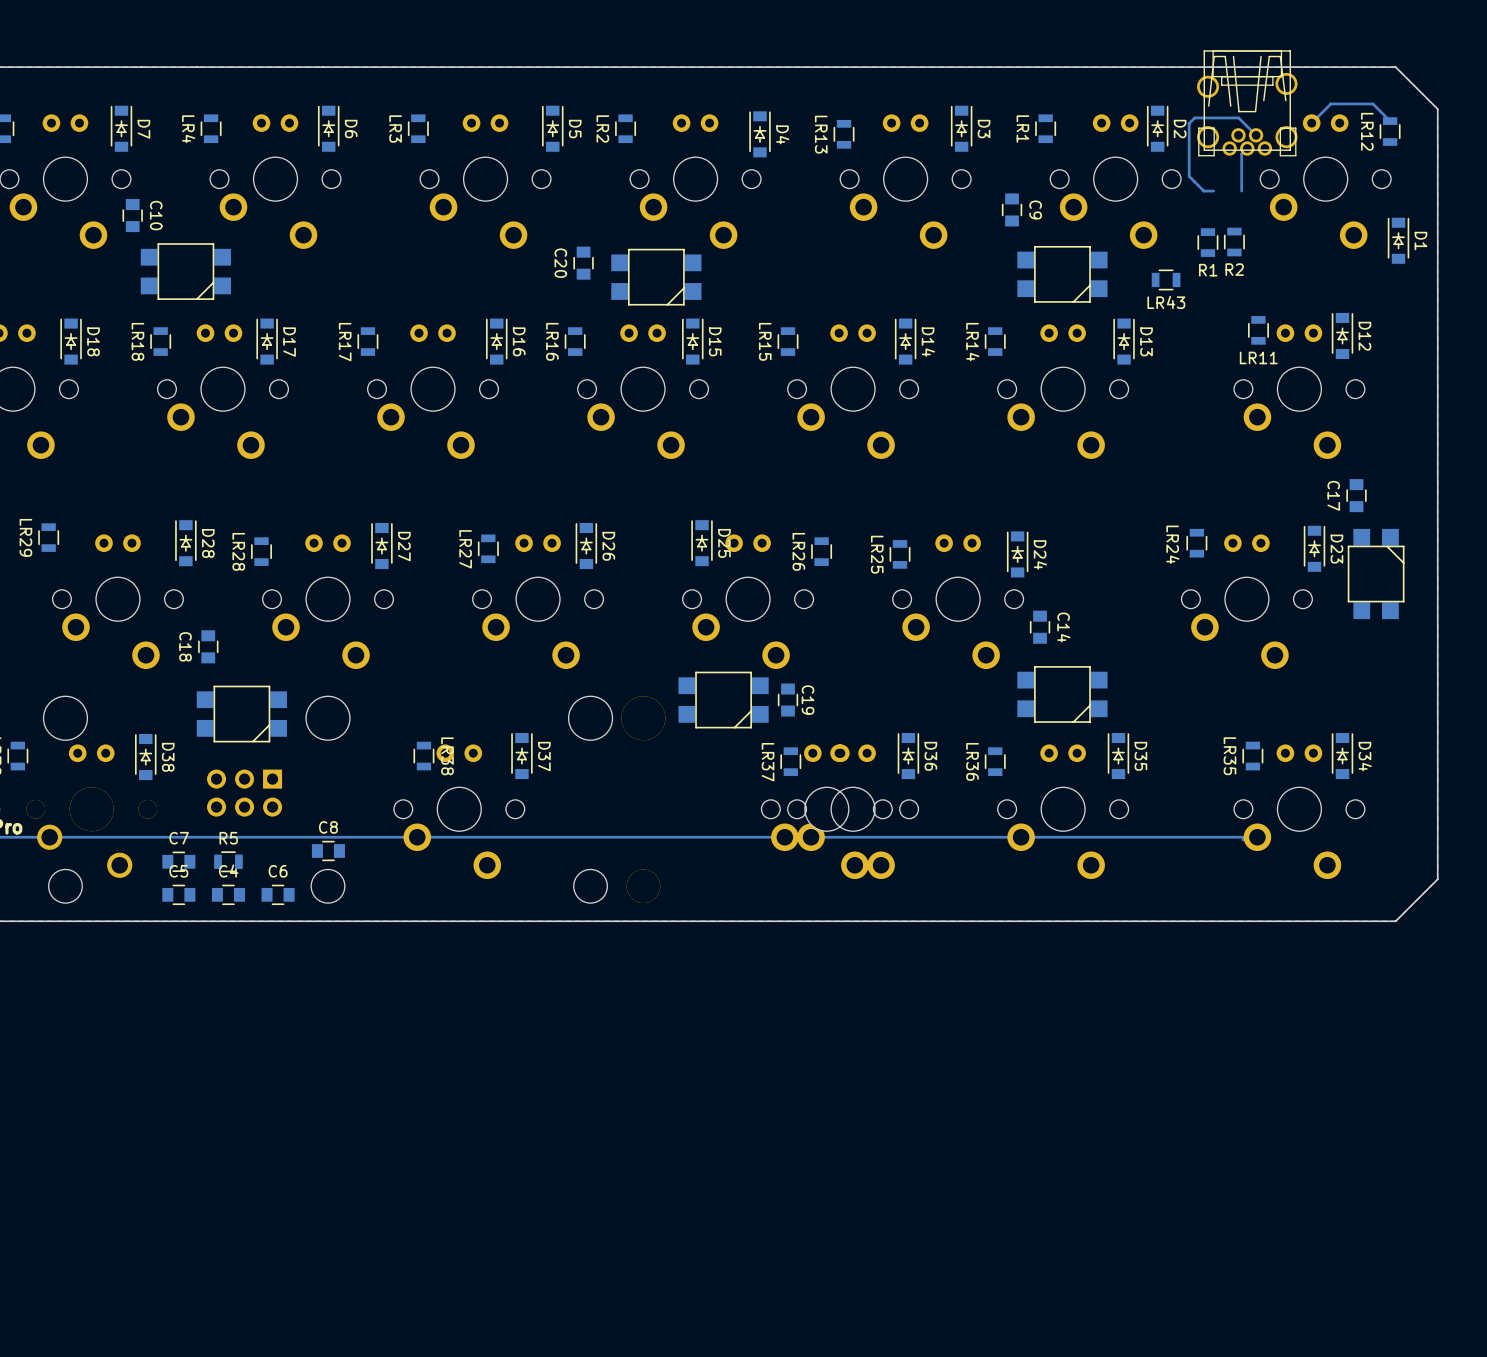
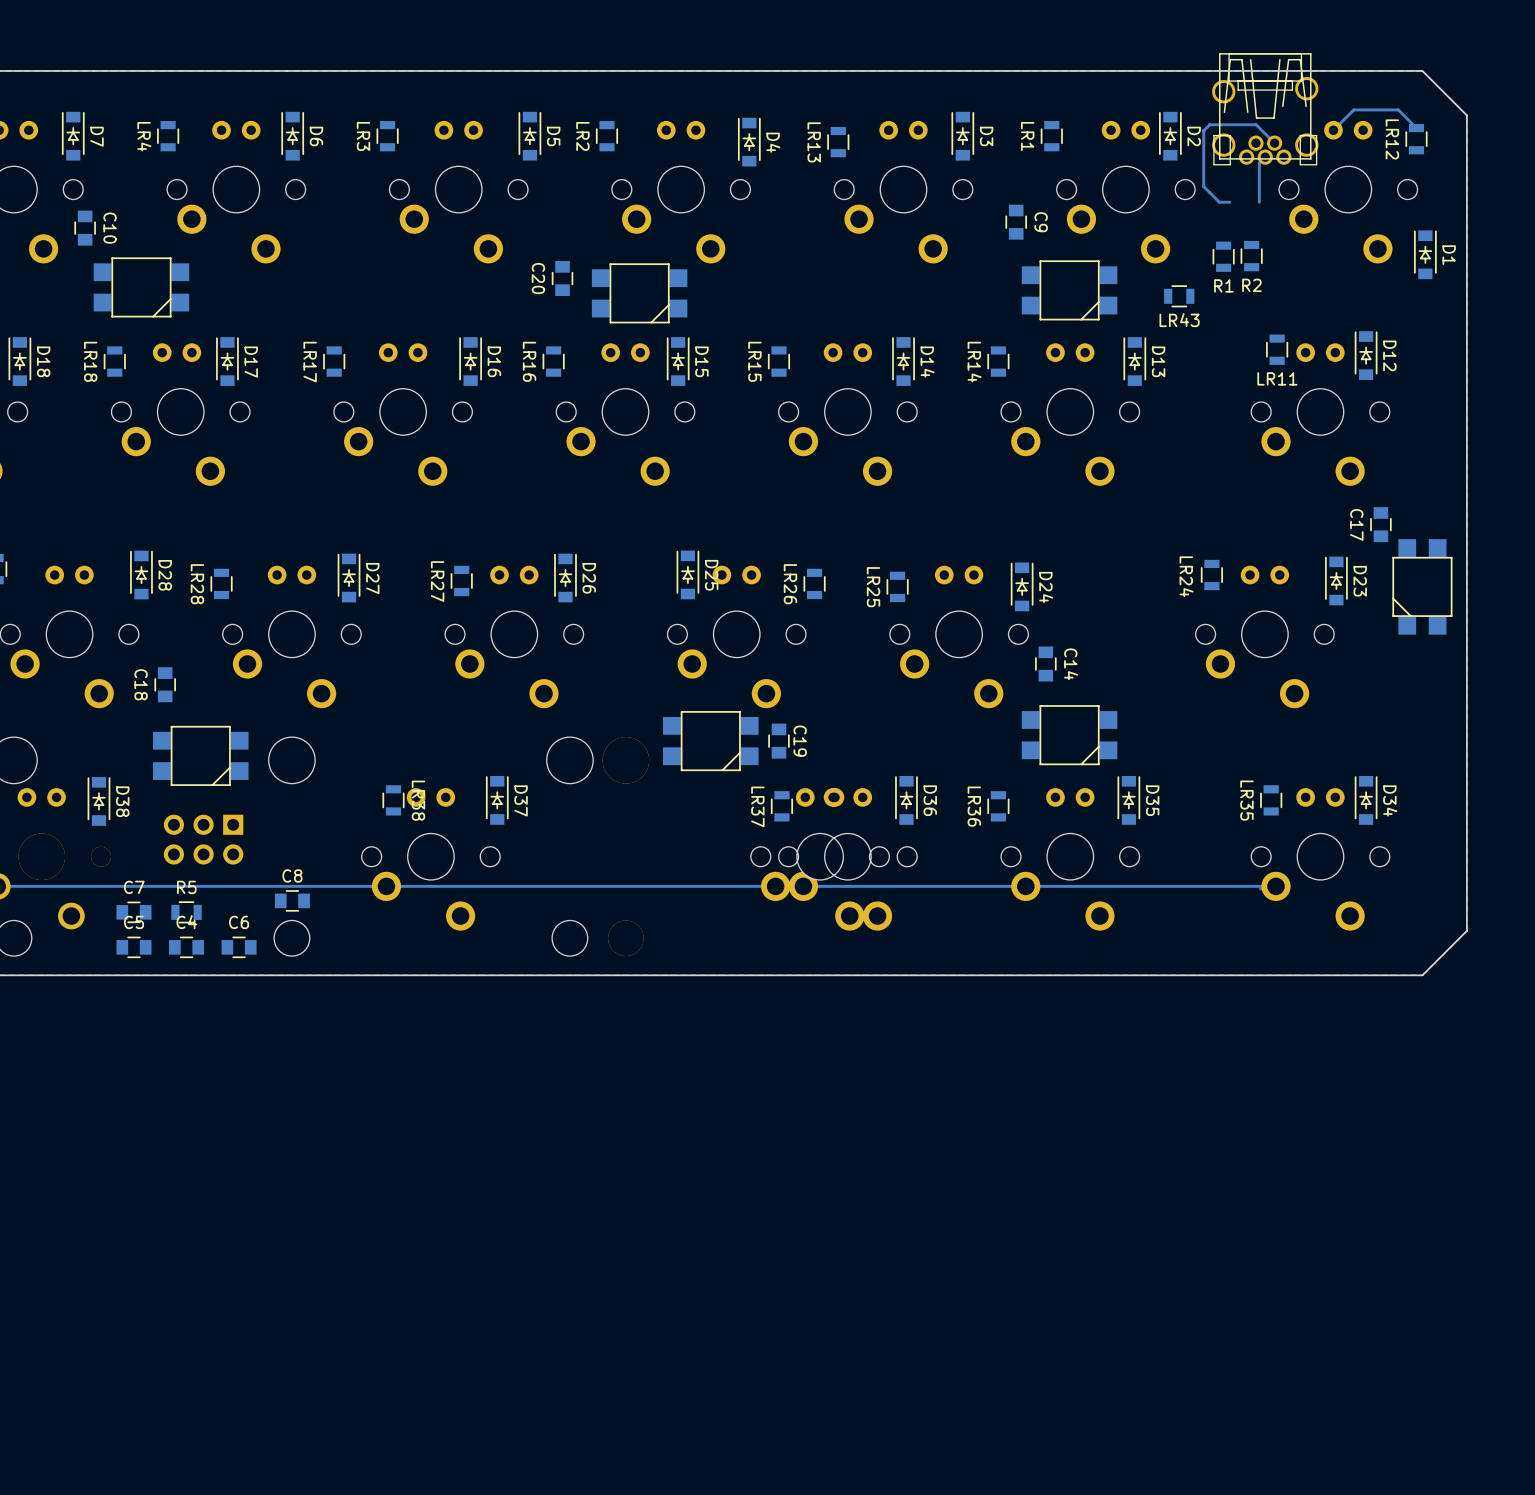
part rotation: 0° (1376, 574) -> 180° (1422, 586)

